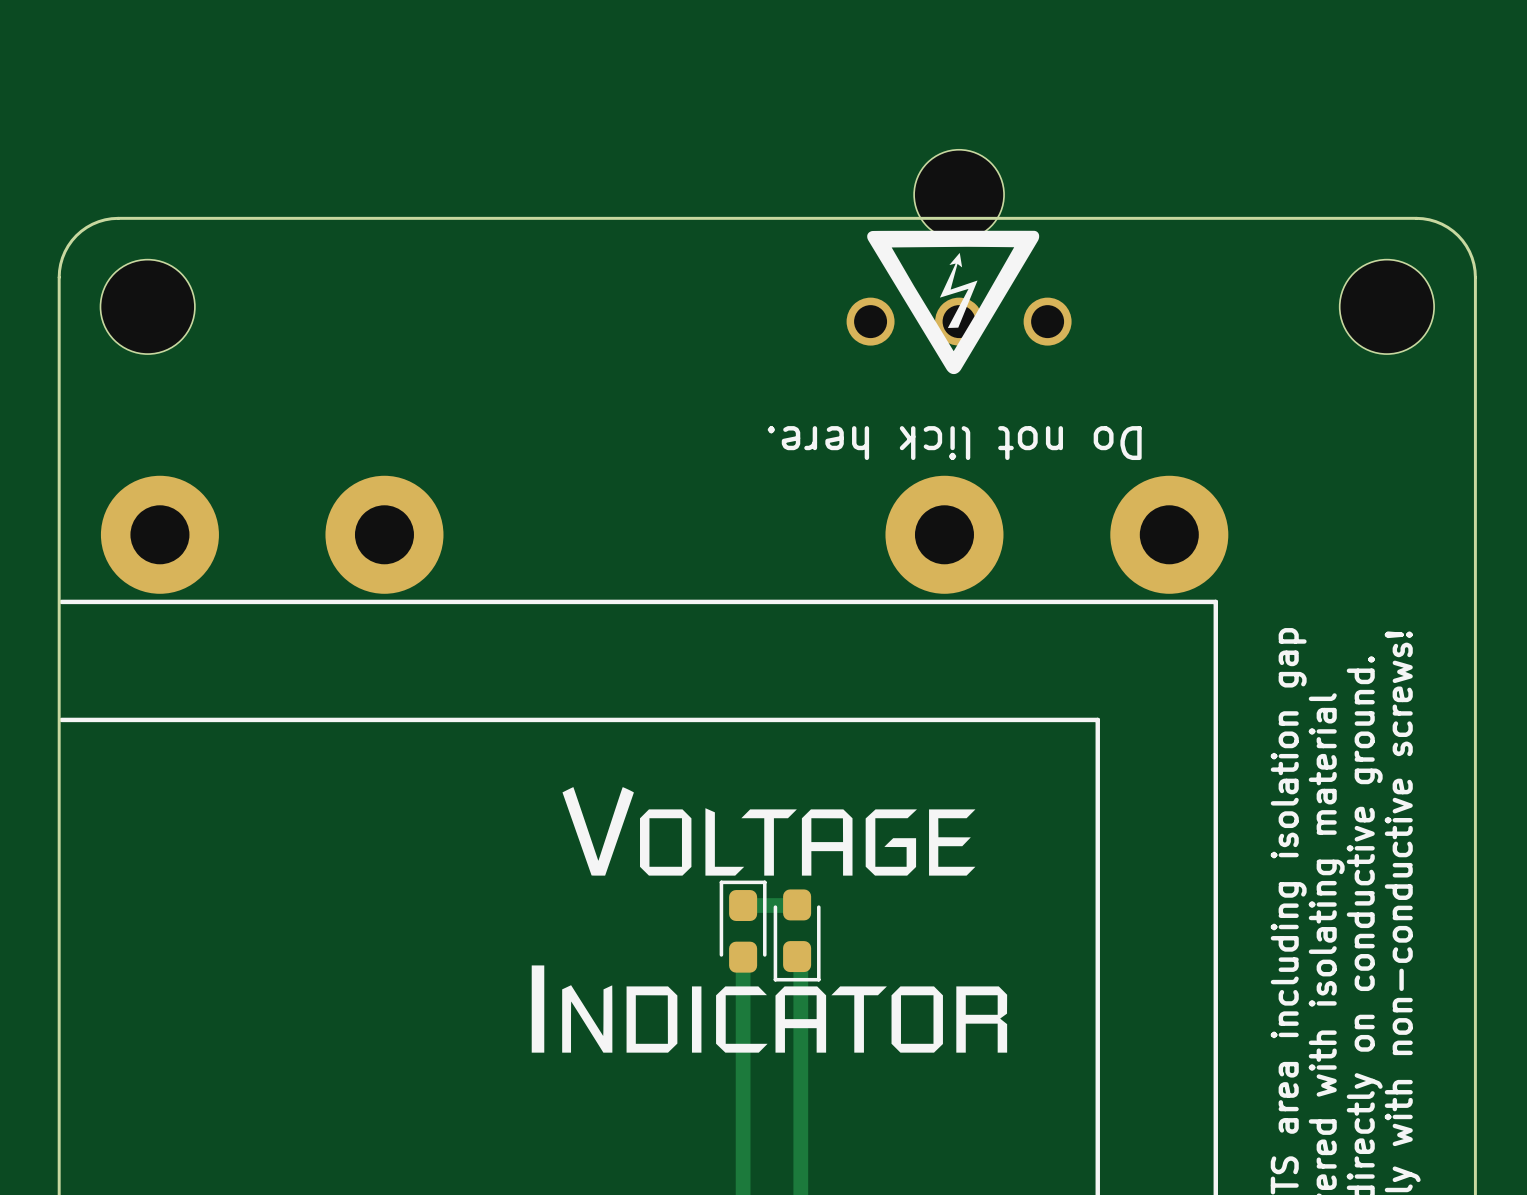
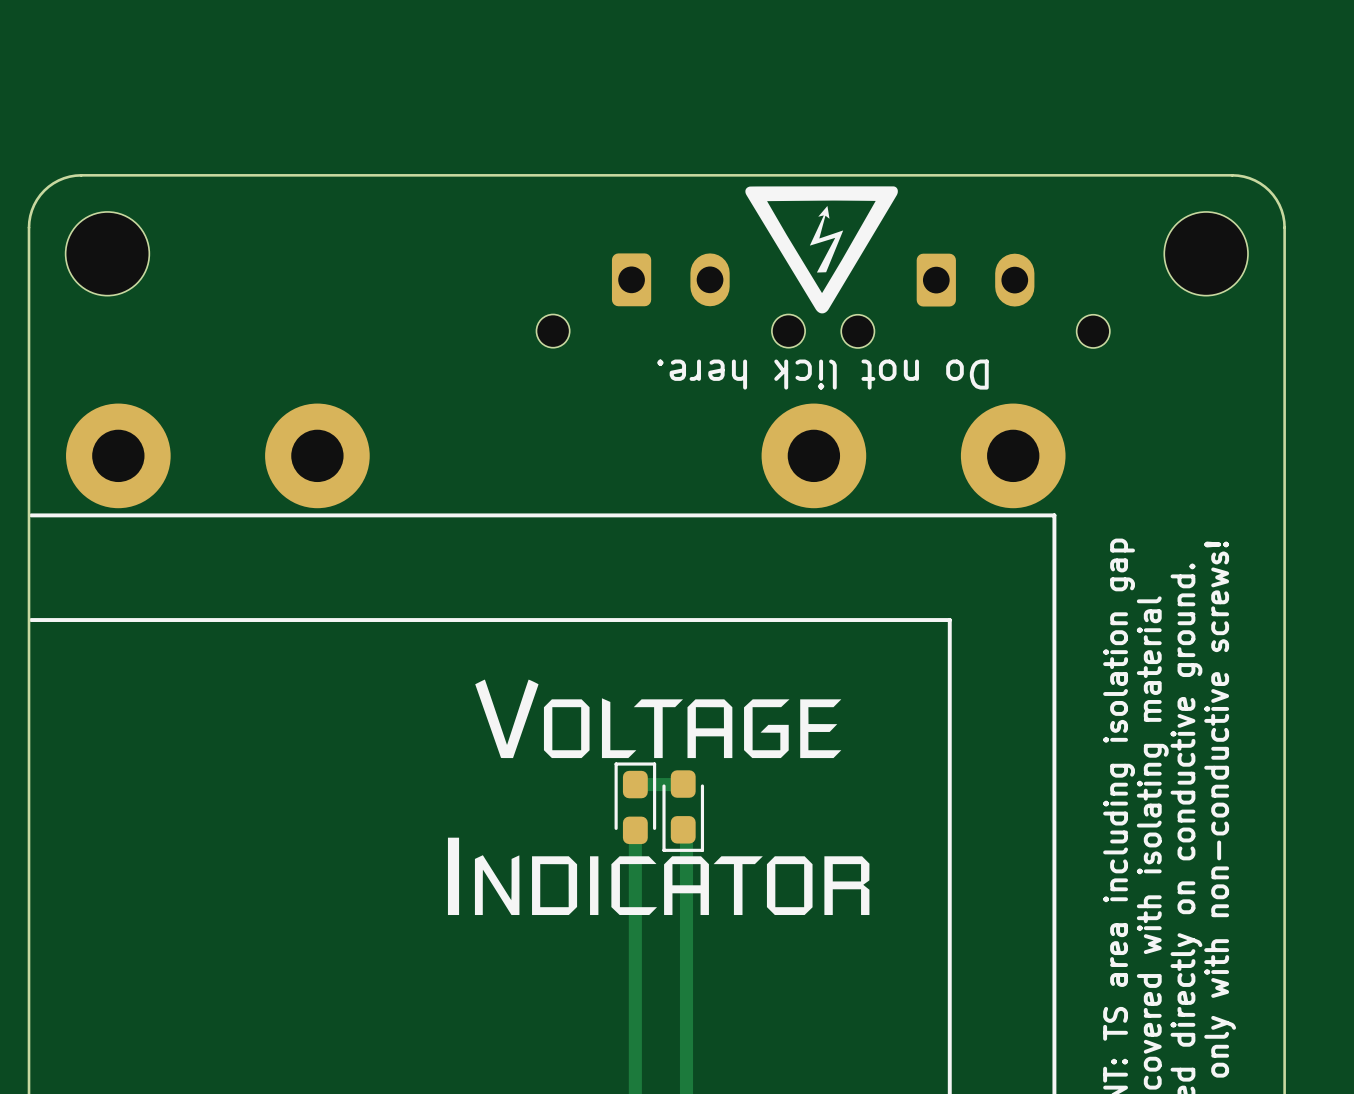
part: (990, 247) -> none
part: none -> (670, 300)
part: none -> (975, 300)

